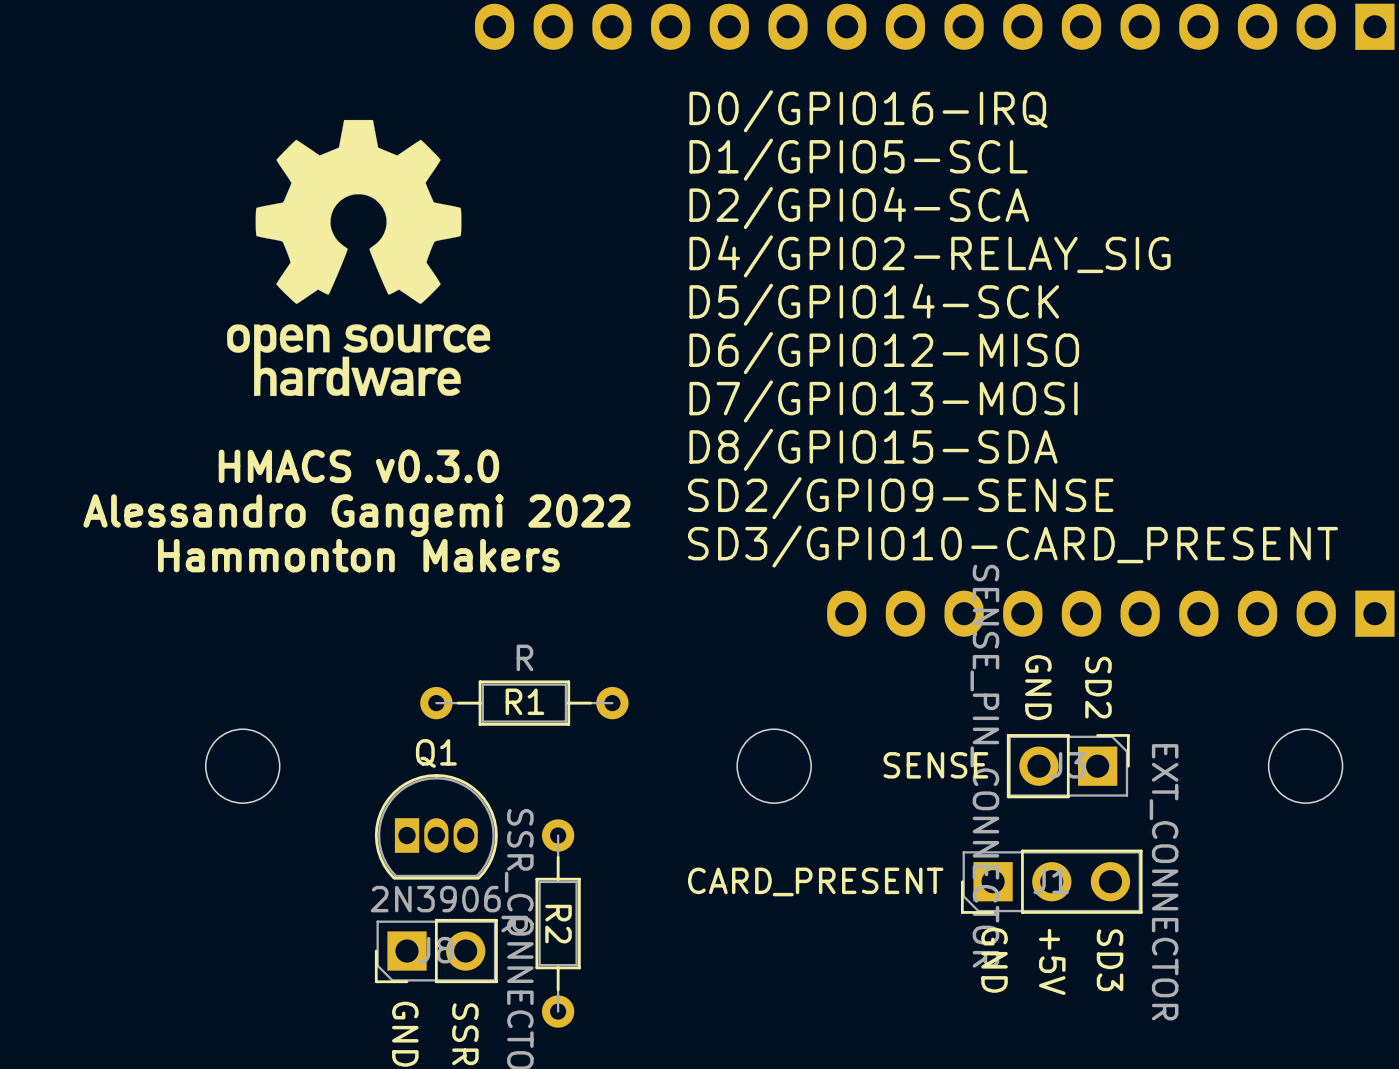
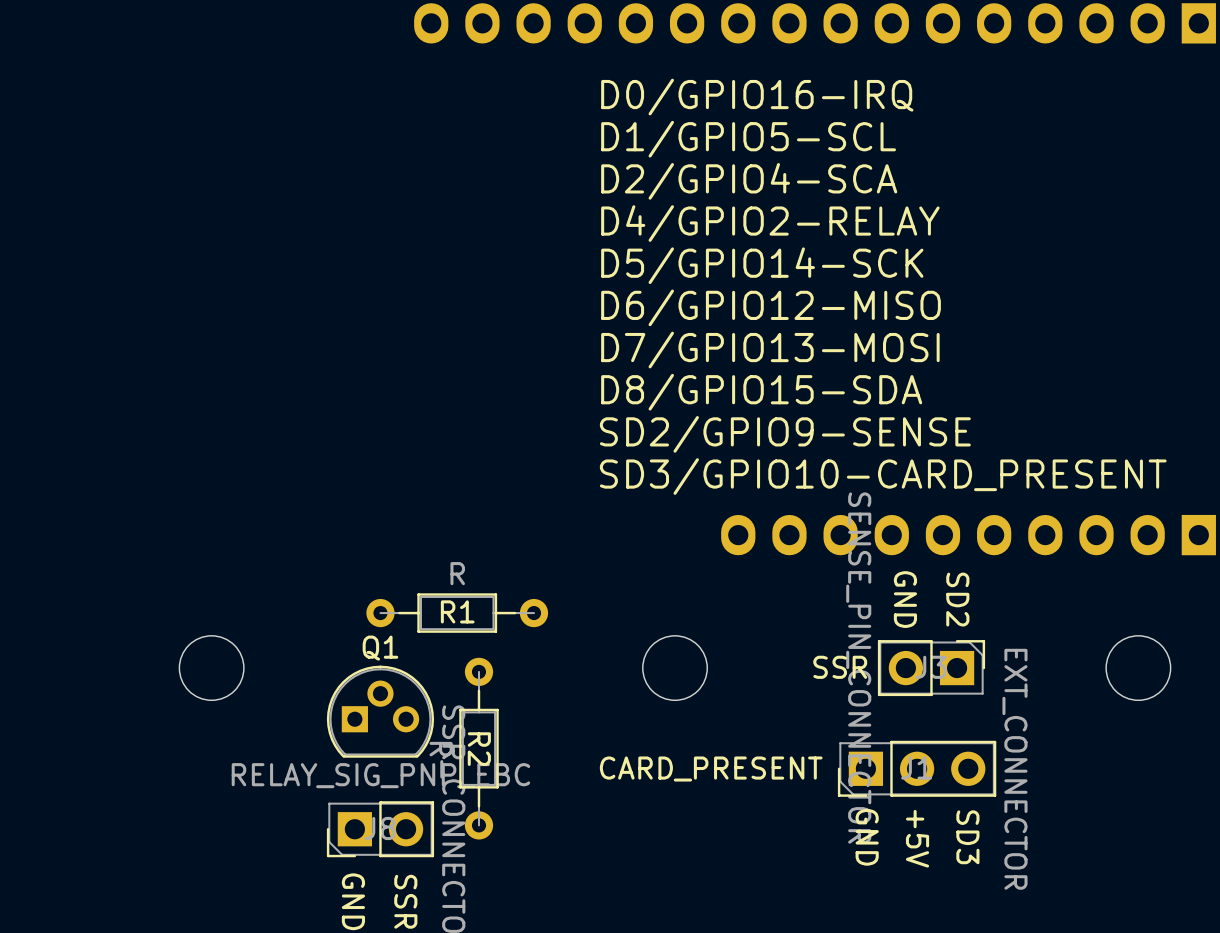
drawing: [226, 119, 491, 397] -> none
text: D4/GPIO2-RELAY_SIG (930, 256) -> D4/GPIO2-RELAY (770, 223)
text: HMACS v0.3.0 (358, 466) -> none
text: Alessandro Gangemi 2022 (356, 515) -> none
text: Hammonton Makers (358, 555) -> none
text: SENSE (935, 765) -> none
text: none -> SSR (840, 667)
Q1 footprint: [374, 774, 498, 880] -> [326, 665, 435, 758]
Q1 value: 2N3906 (435, 899) -> RELAY_SIG_PNP_EBC (380, 775)
R2 position: (558, 923) -> (478, 748)

